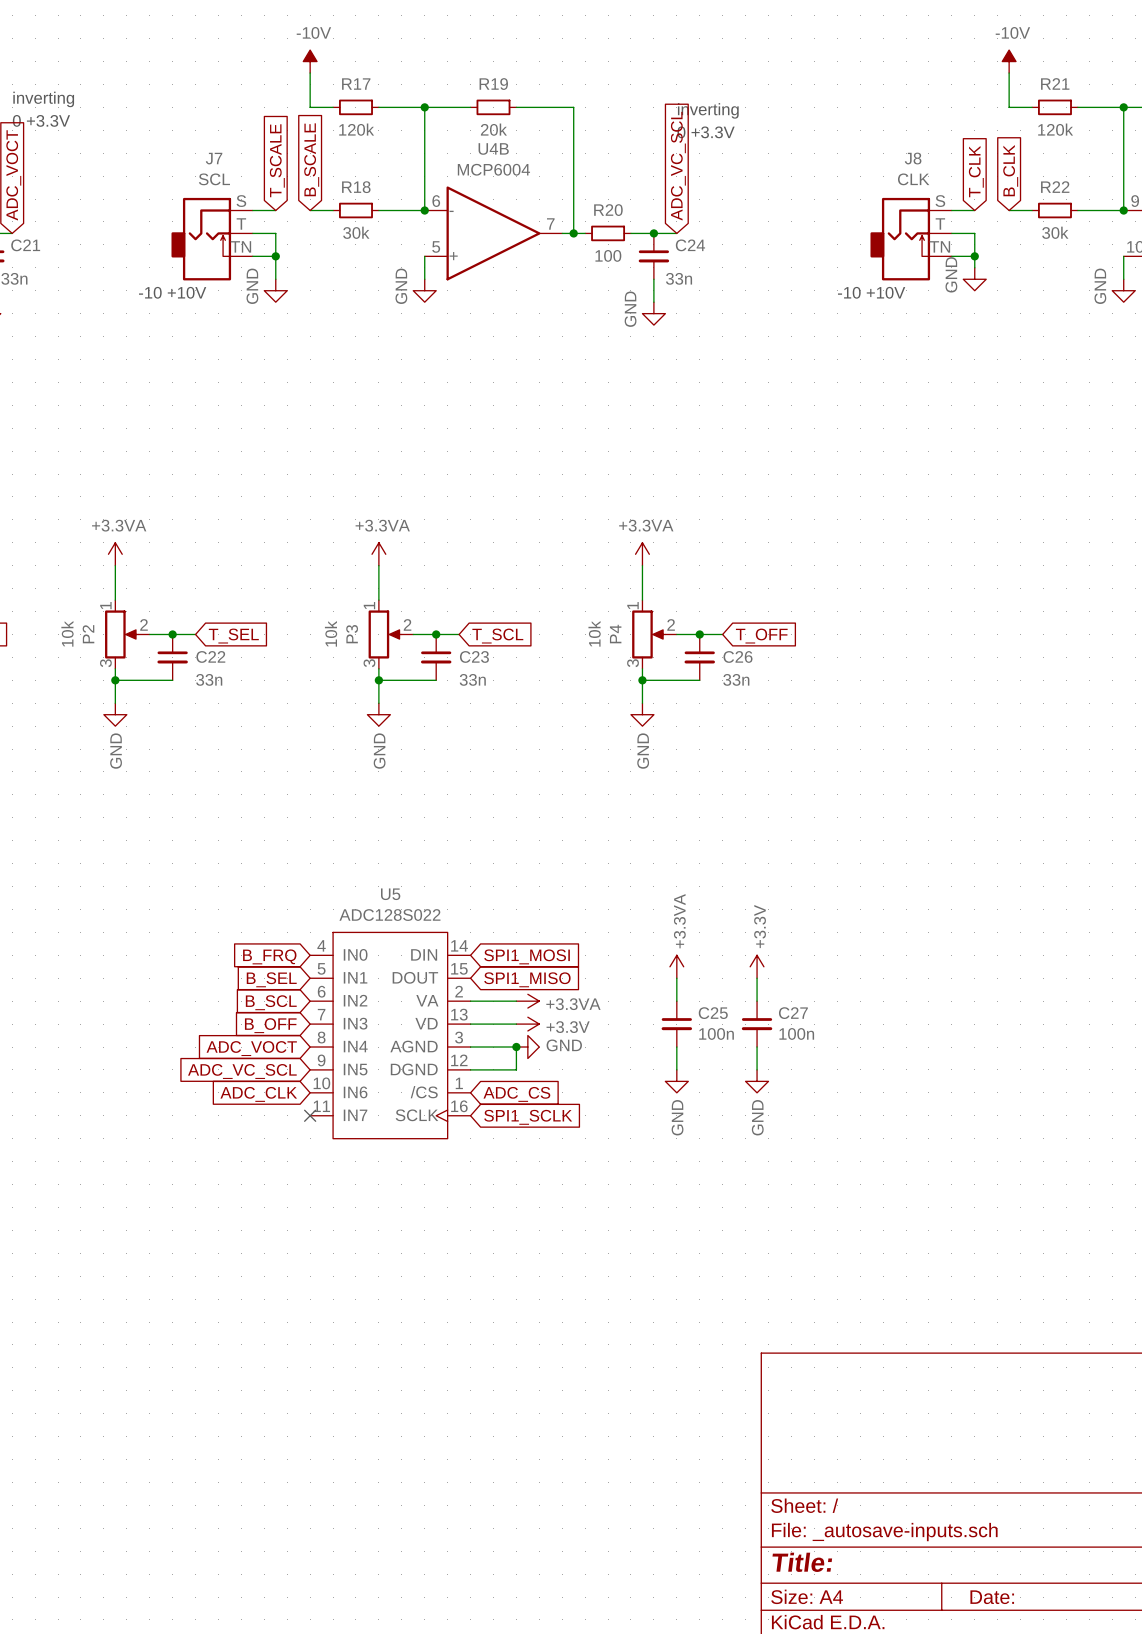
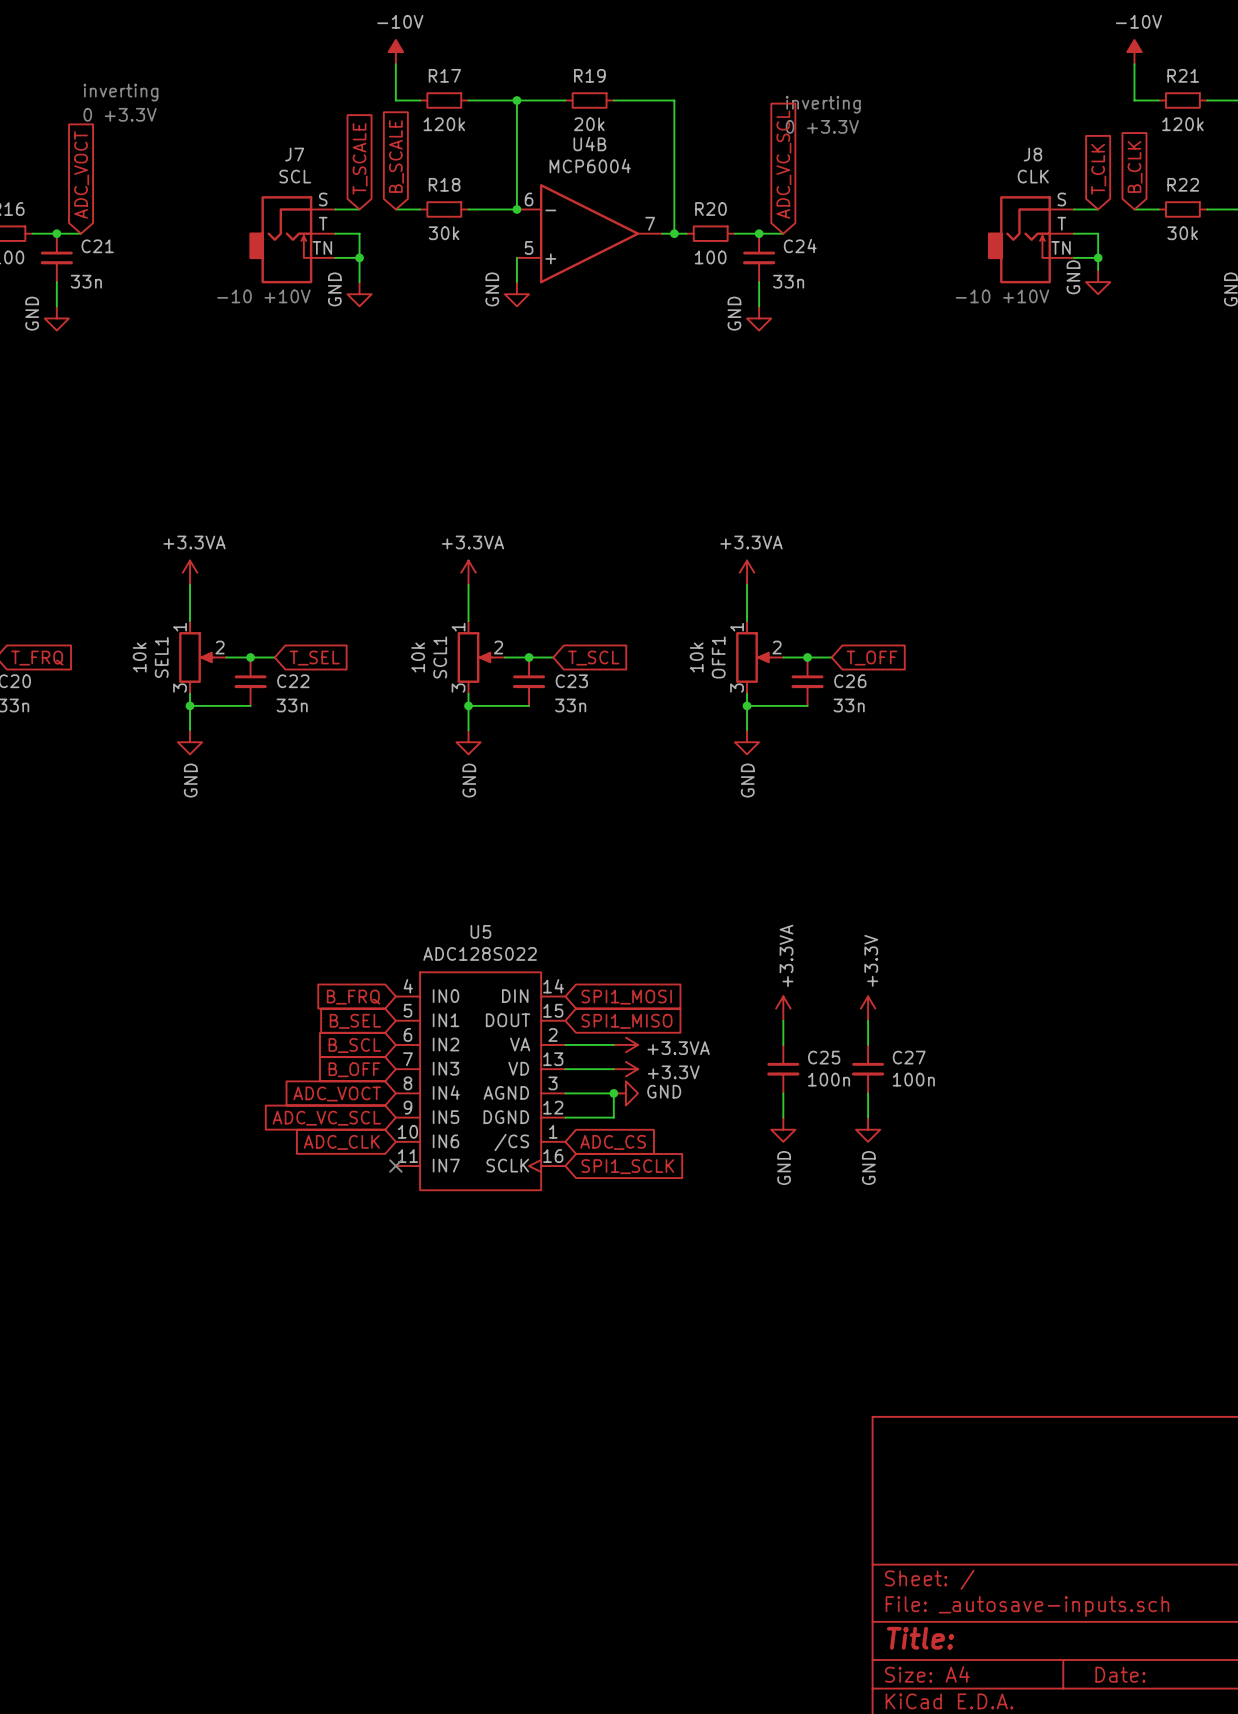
P2 name: P2 (88, 634) -> SEL1 (161, 657)
P3 name: P3 (352, 634) -> SCL1 (440, 657)
P4 name: P4 (615, 634) -> OFF1 (718, 657)

